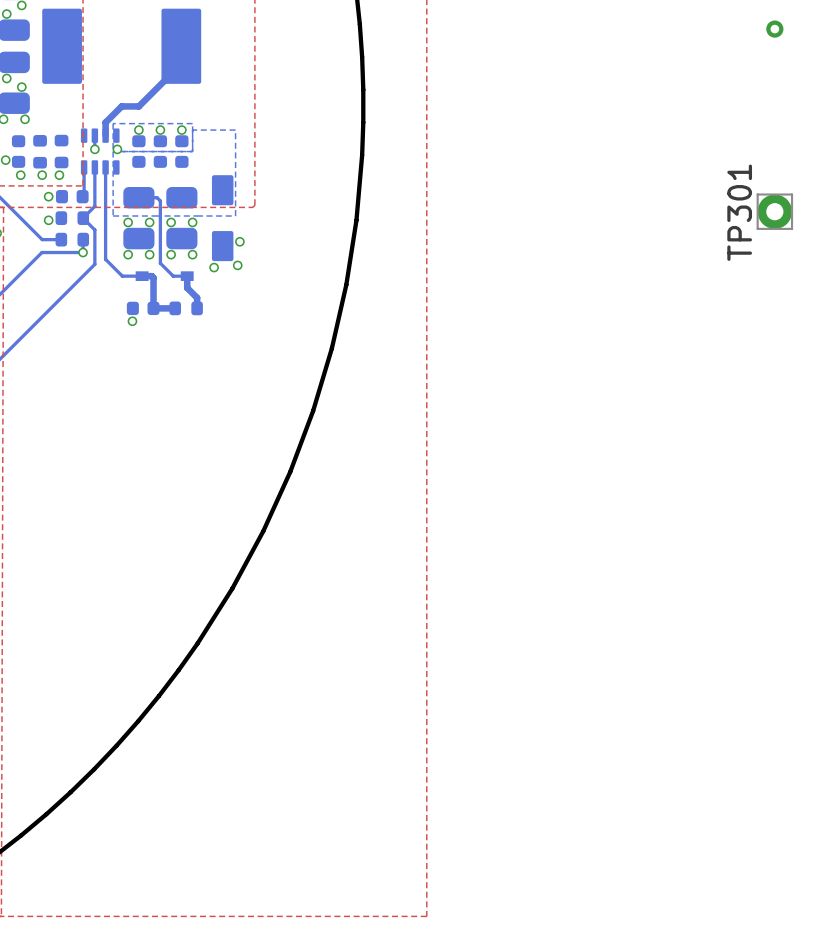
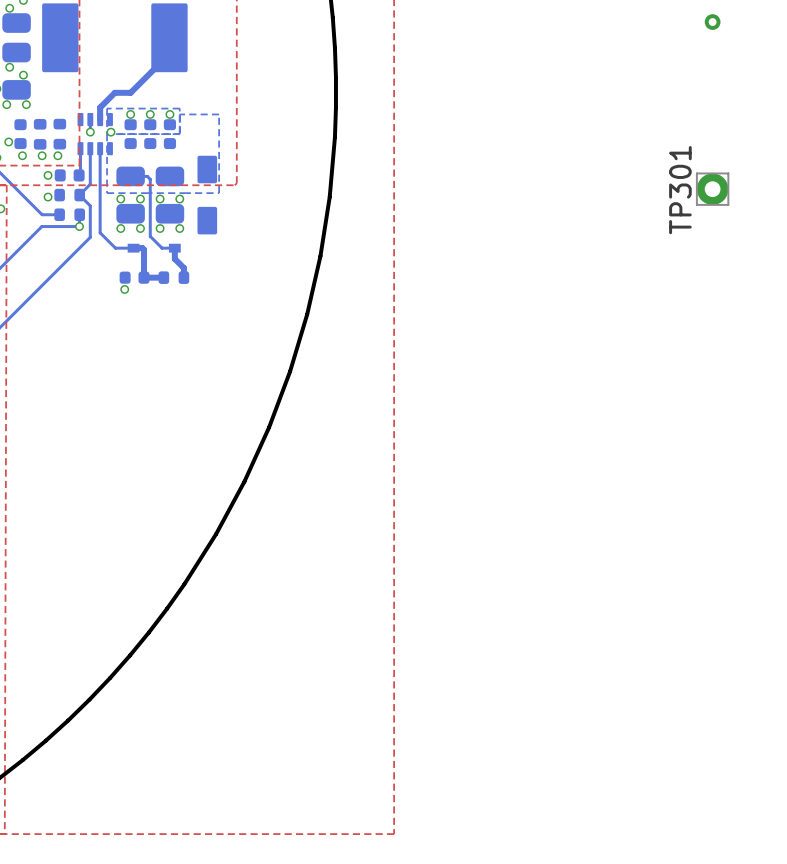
via: (239, 241) -> none
via: (237, 265) -> none
via: (214, 267) -> none

